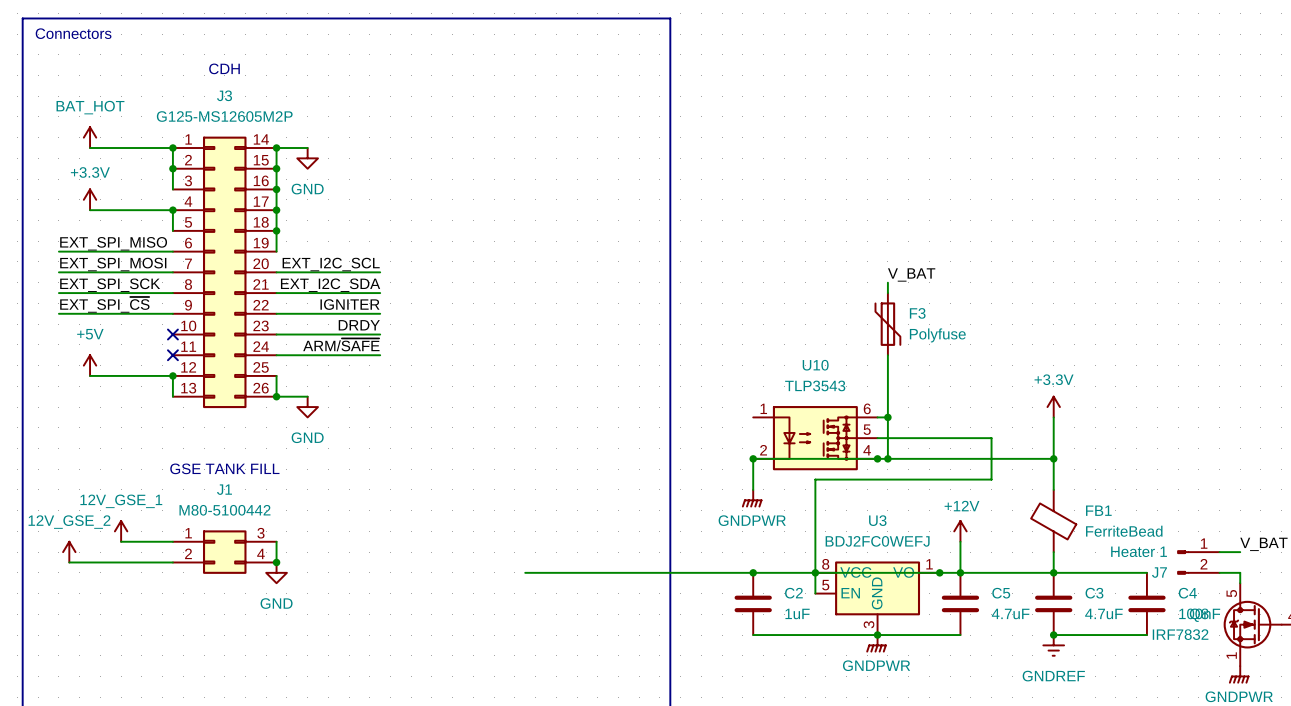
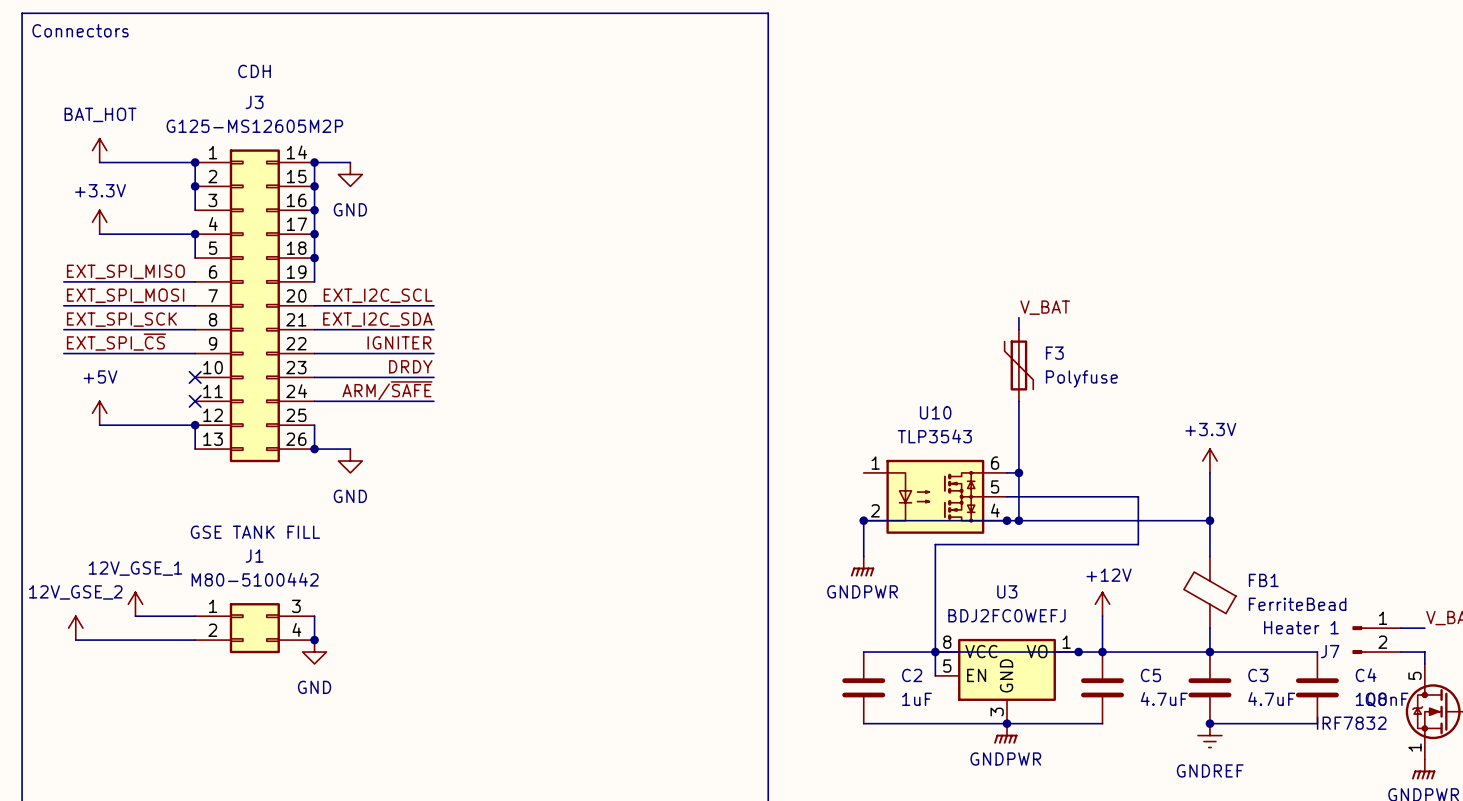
wire: (525, 572) (753, 572) -> none
junction: (753, 572) -> none

